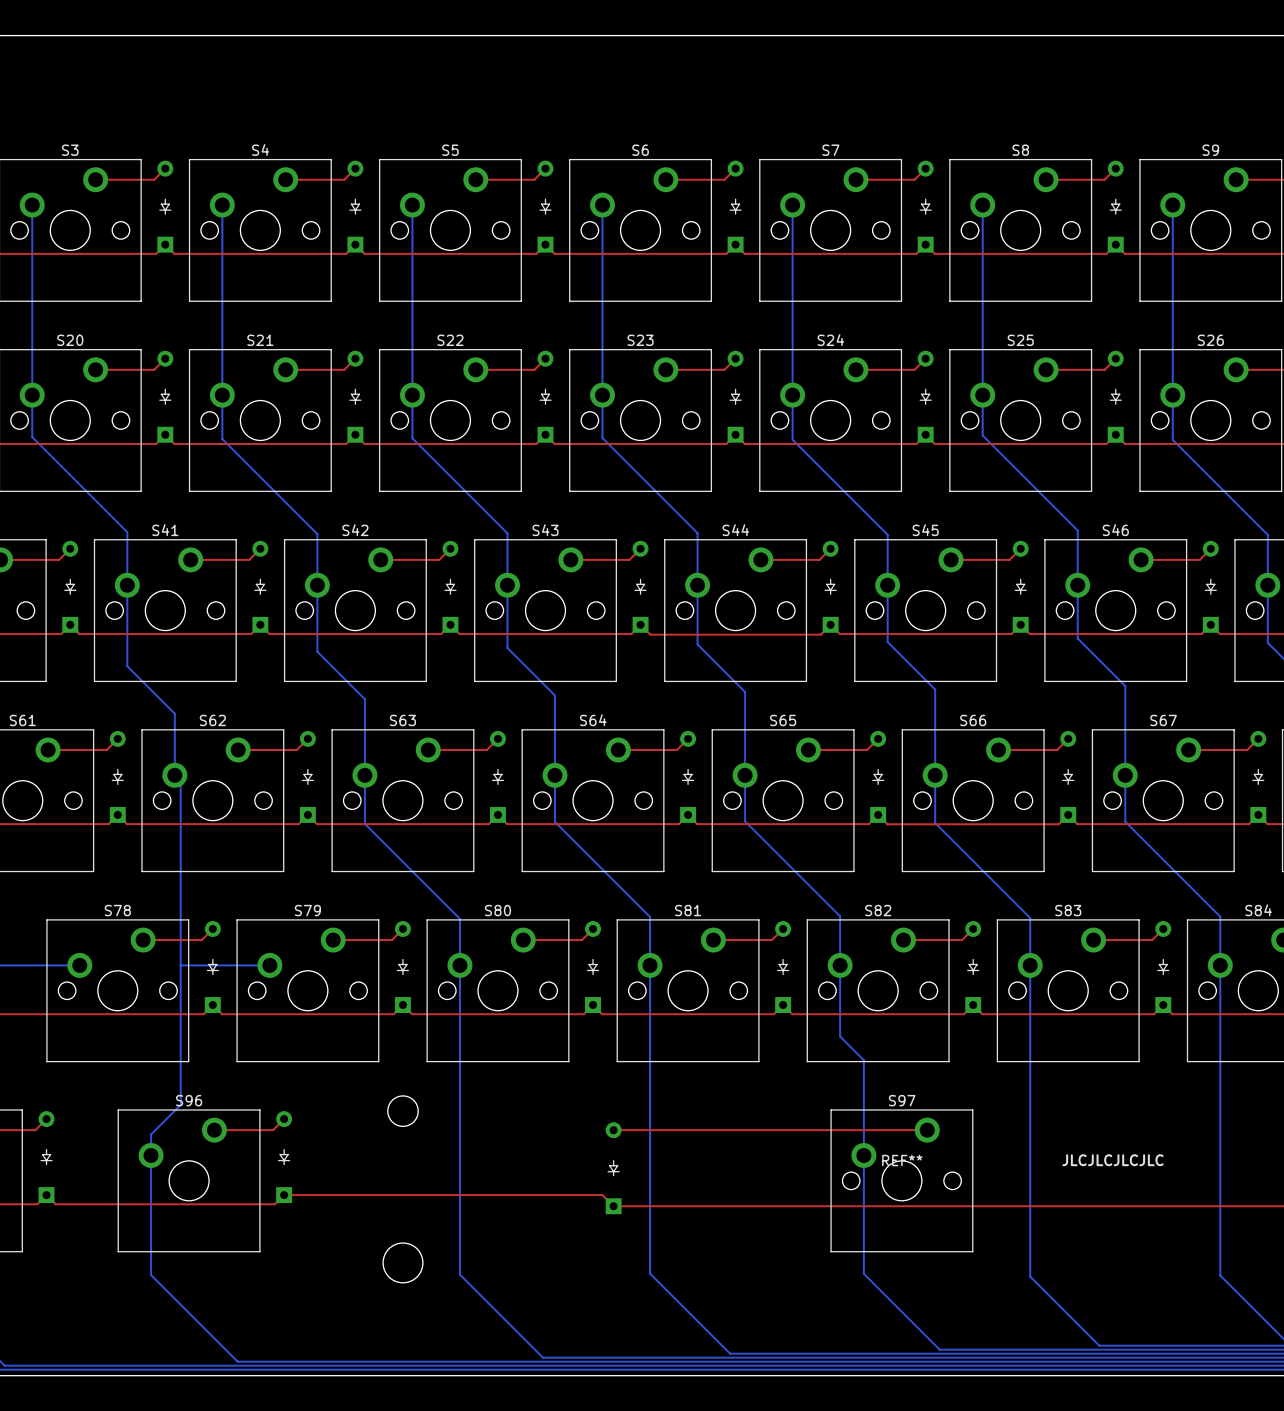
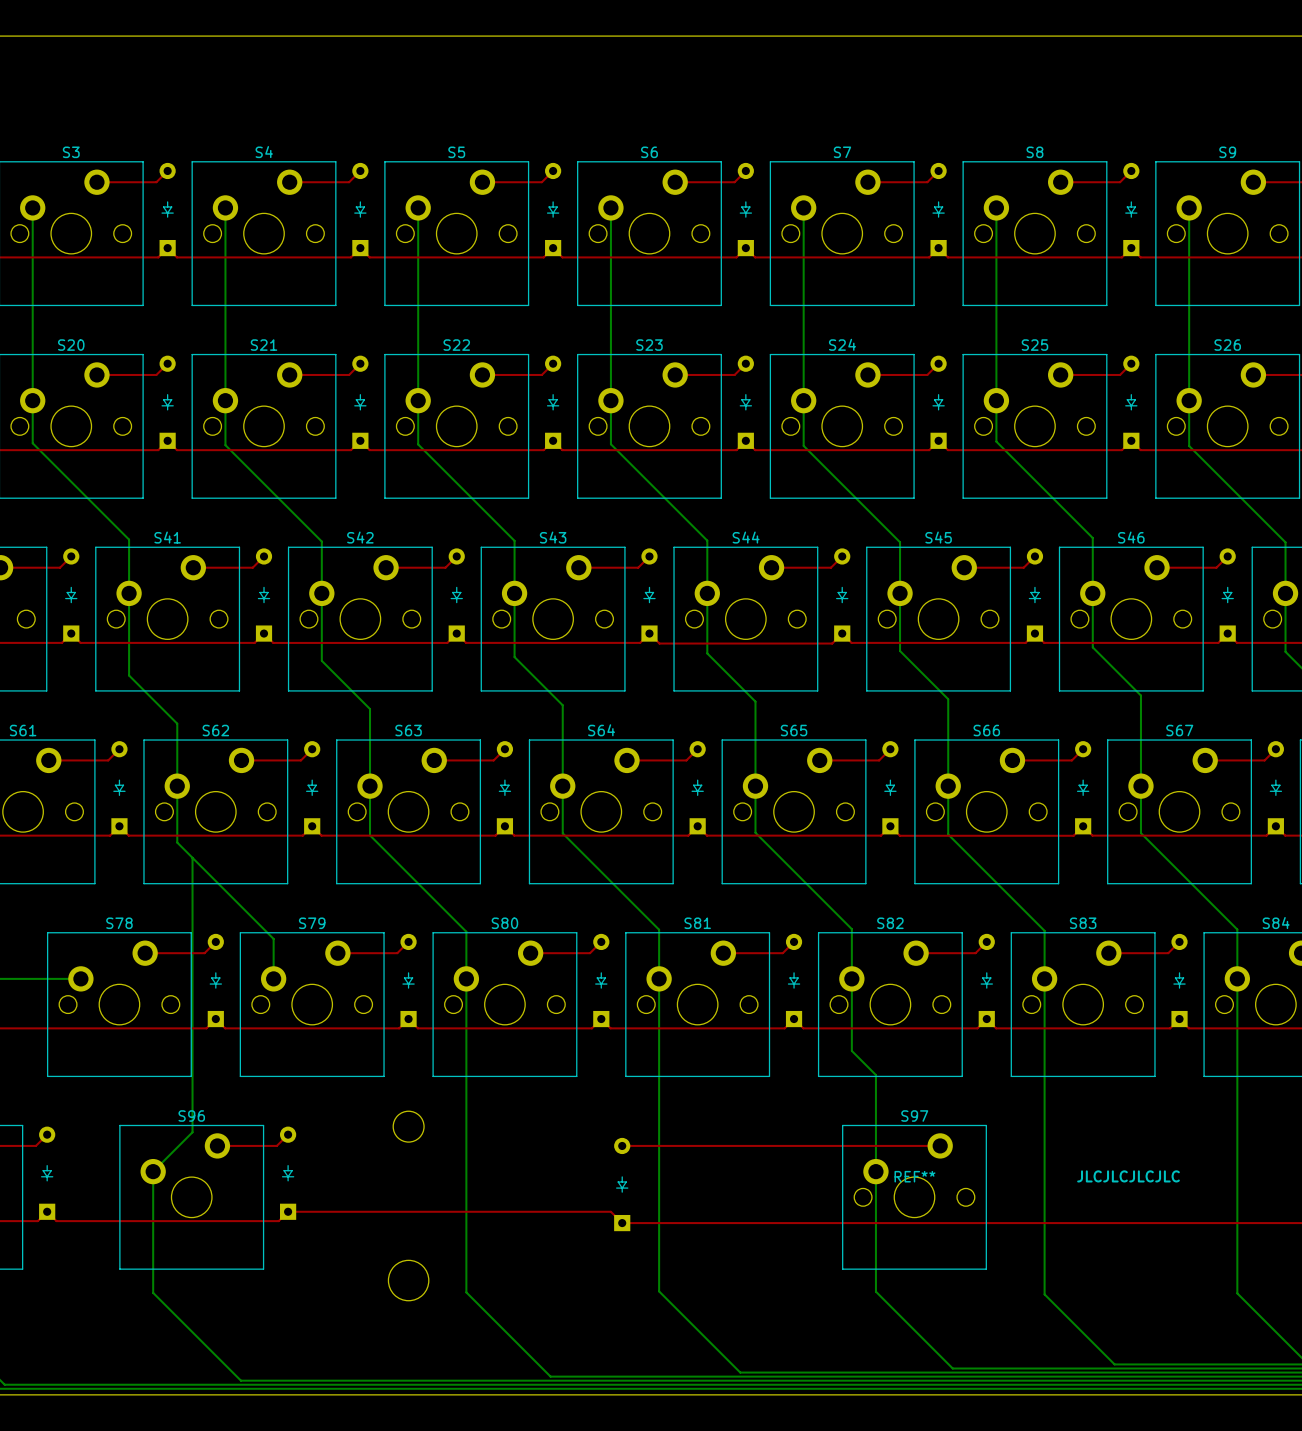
bottom track: (174, 775) (180, 781) (180, 1104) (151, 1134) (151, 1155) -> (192, 857) (192, 1132) (153, 1171)
bottom track: (180, 965) (269, 965) -> (177, 786) (177, 842) (273, 938) (273, 978)

